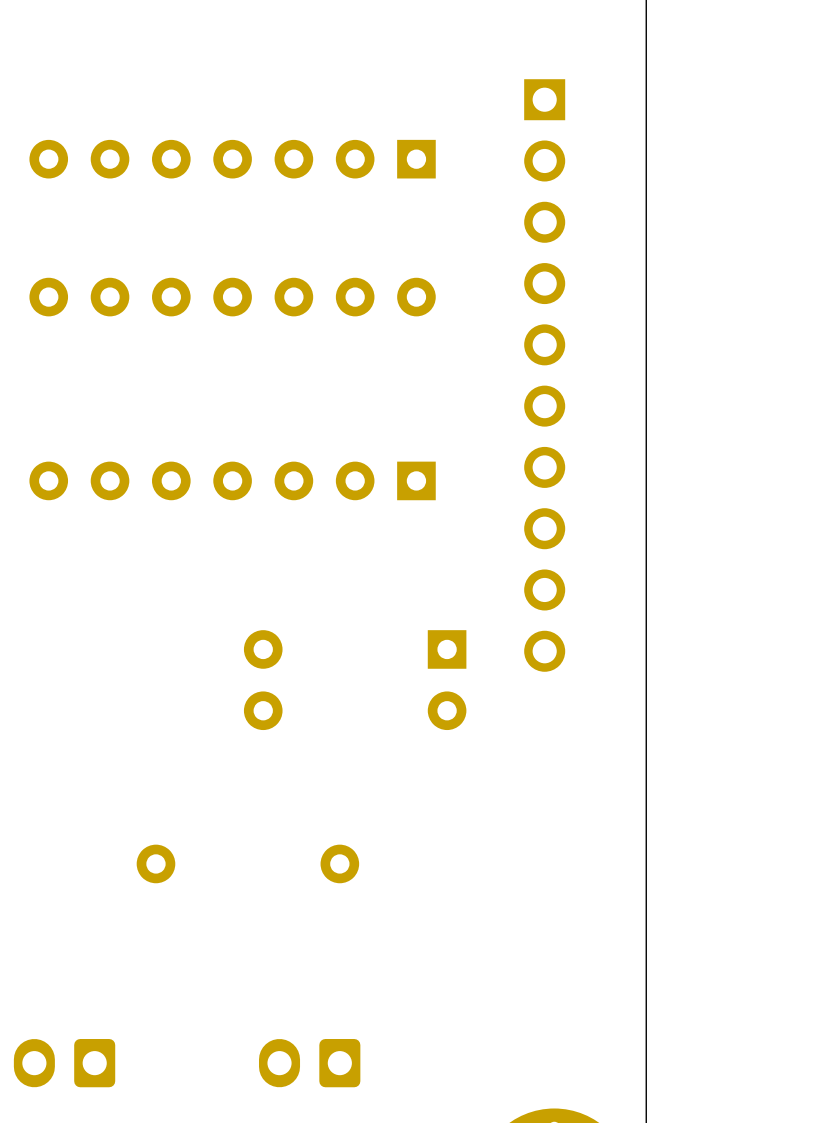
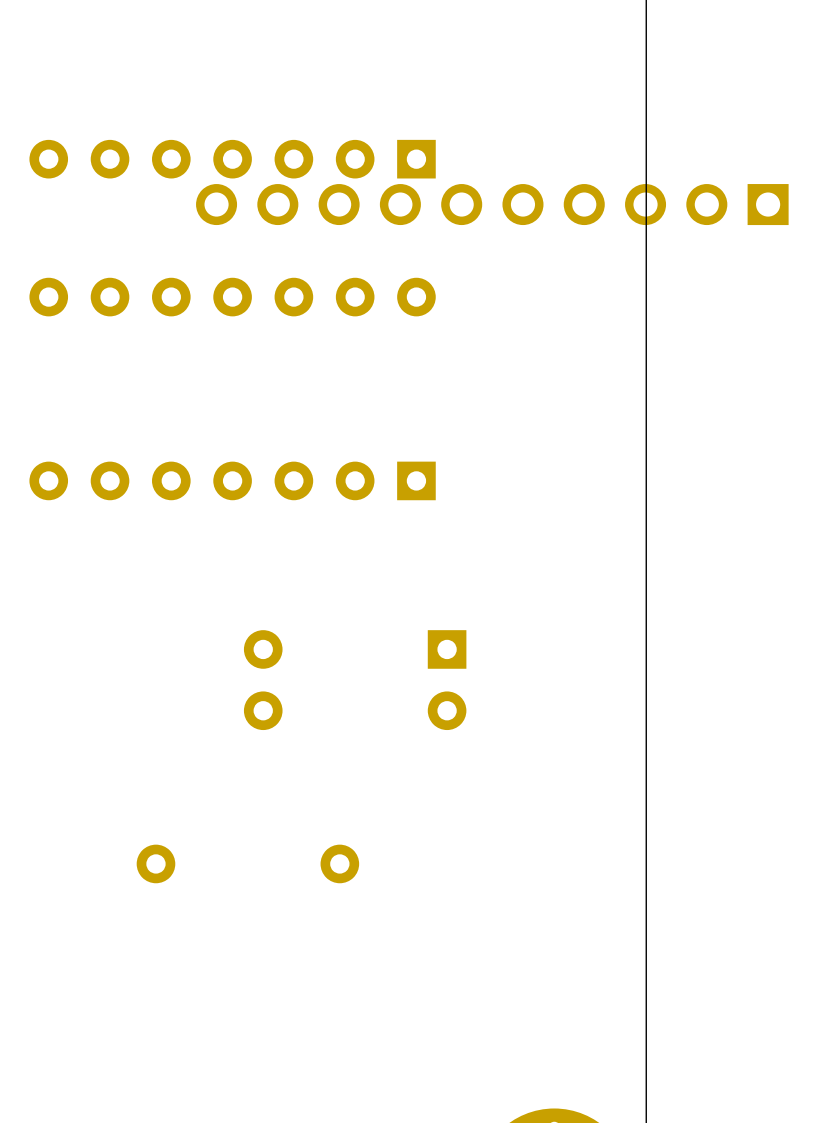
part rotation: 0° (544, 375) -> 90° clockwise (492, 204)
part: (64, 1063) -> none
part: (309, 1063) -> none

